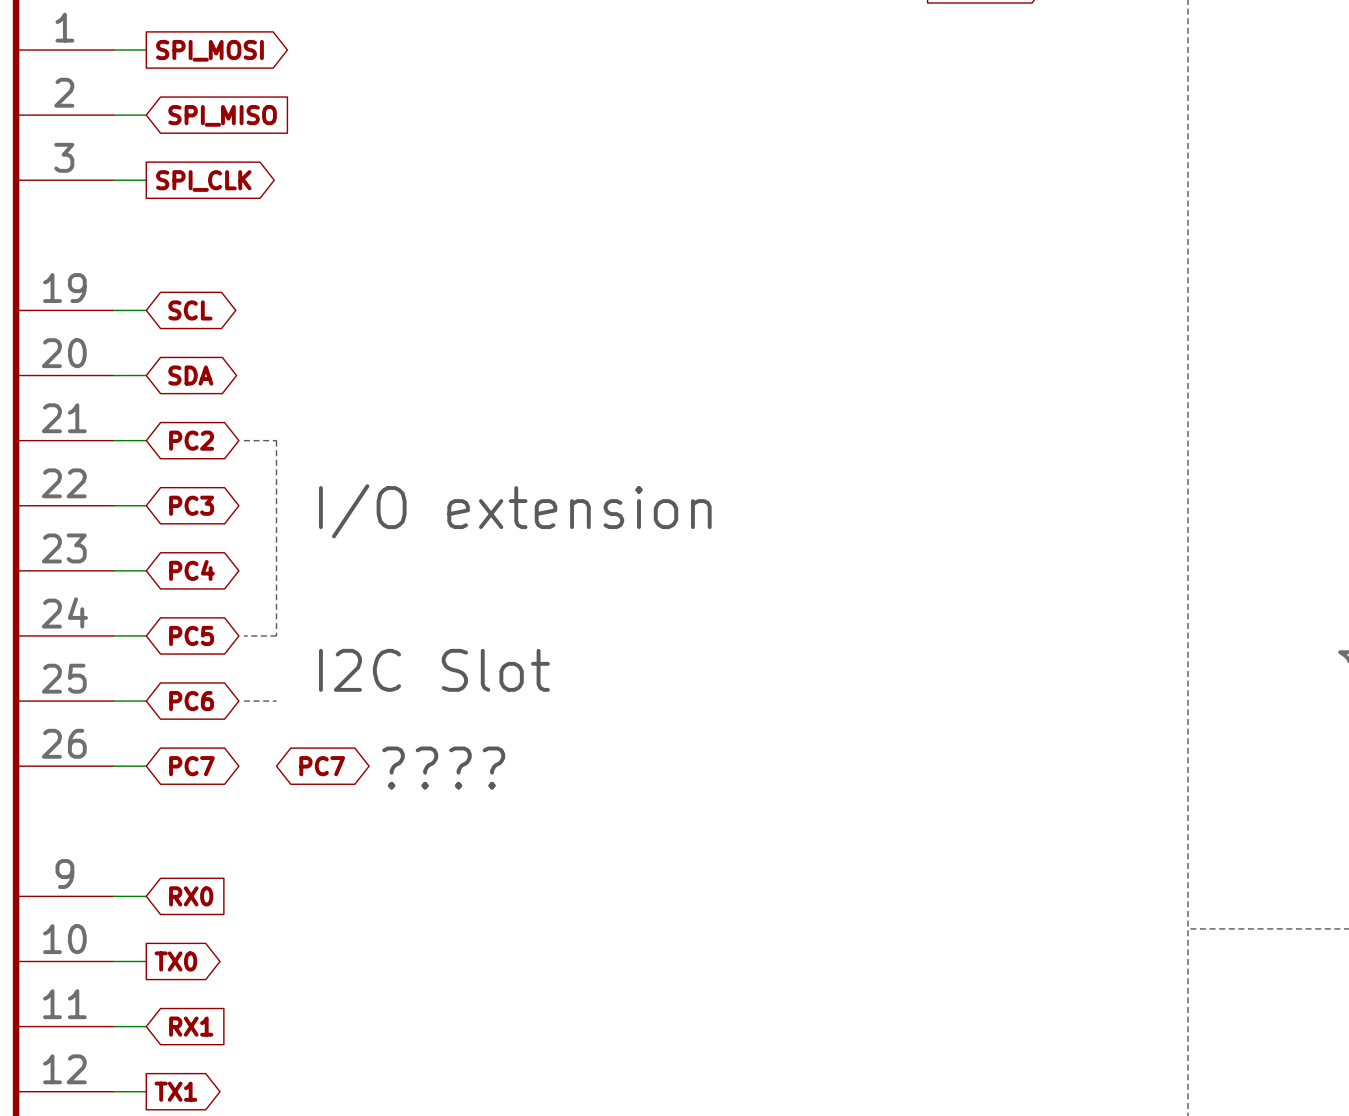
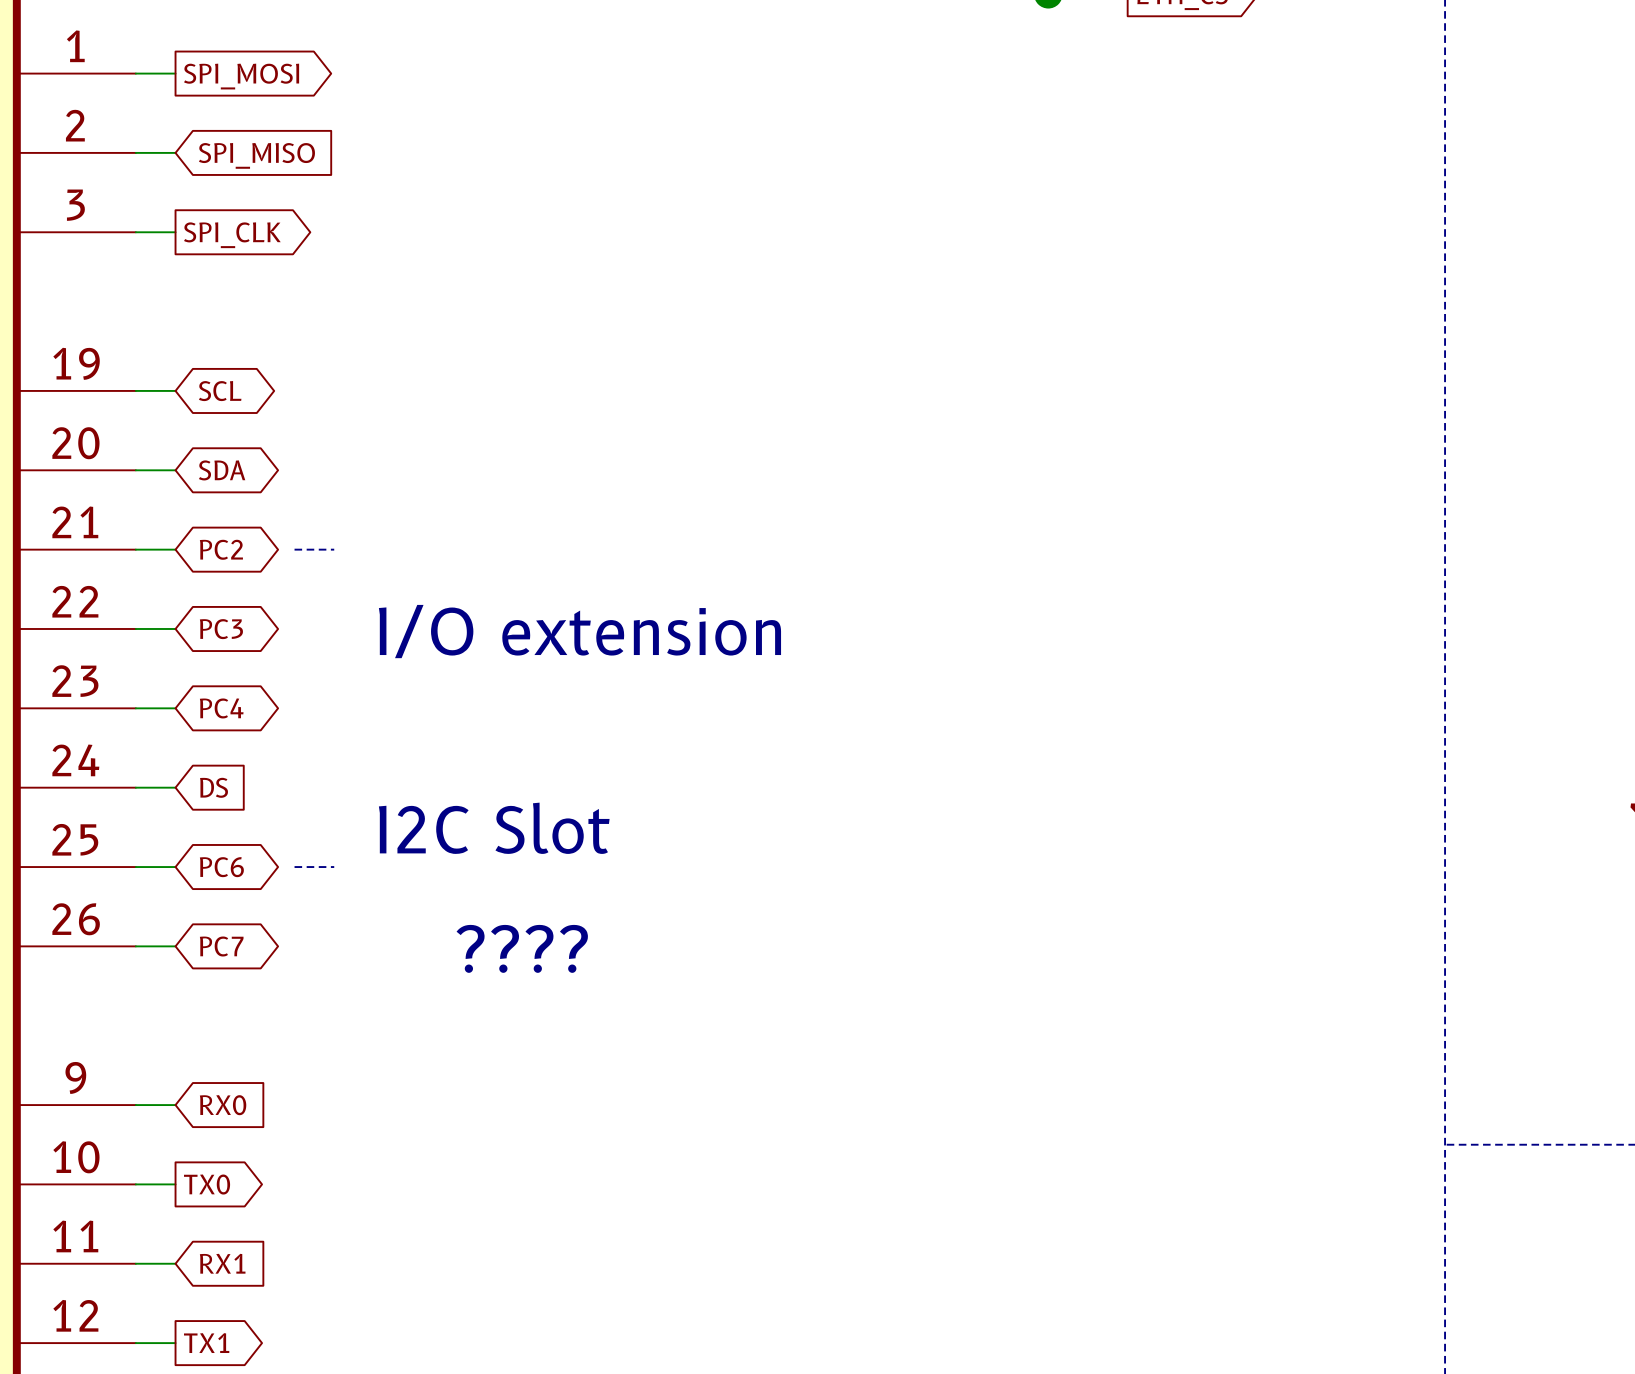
line: (276, 440) (276, 635) (243, 635) -> none
global label shape: bidirectional (191, 635) -> input (214, 787)
global label: PC5 (191, 635) -> DS (214, 787)
global label: PC7 (322, 766) -> none

